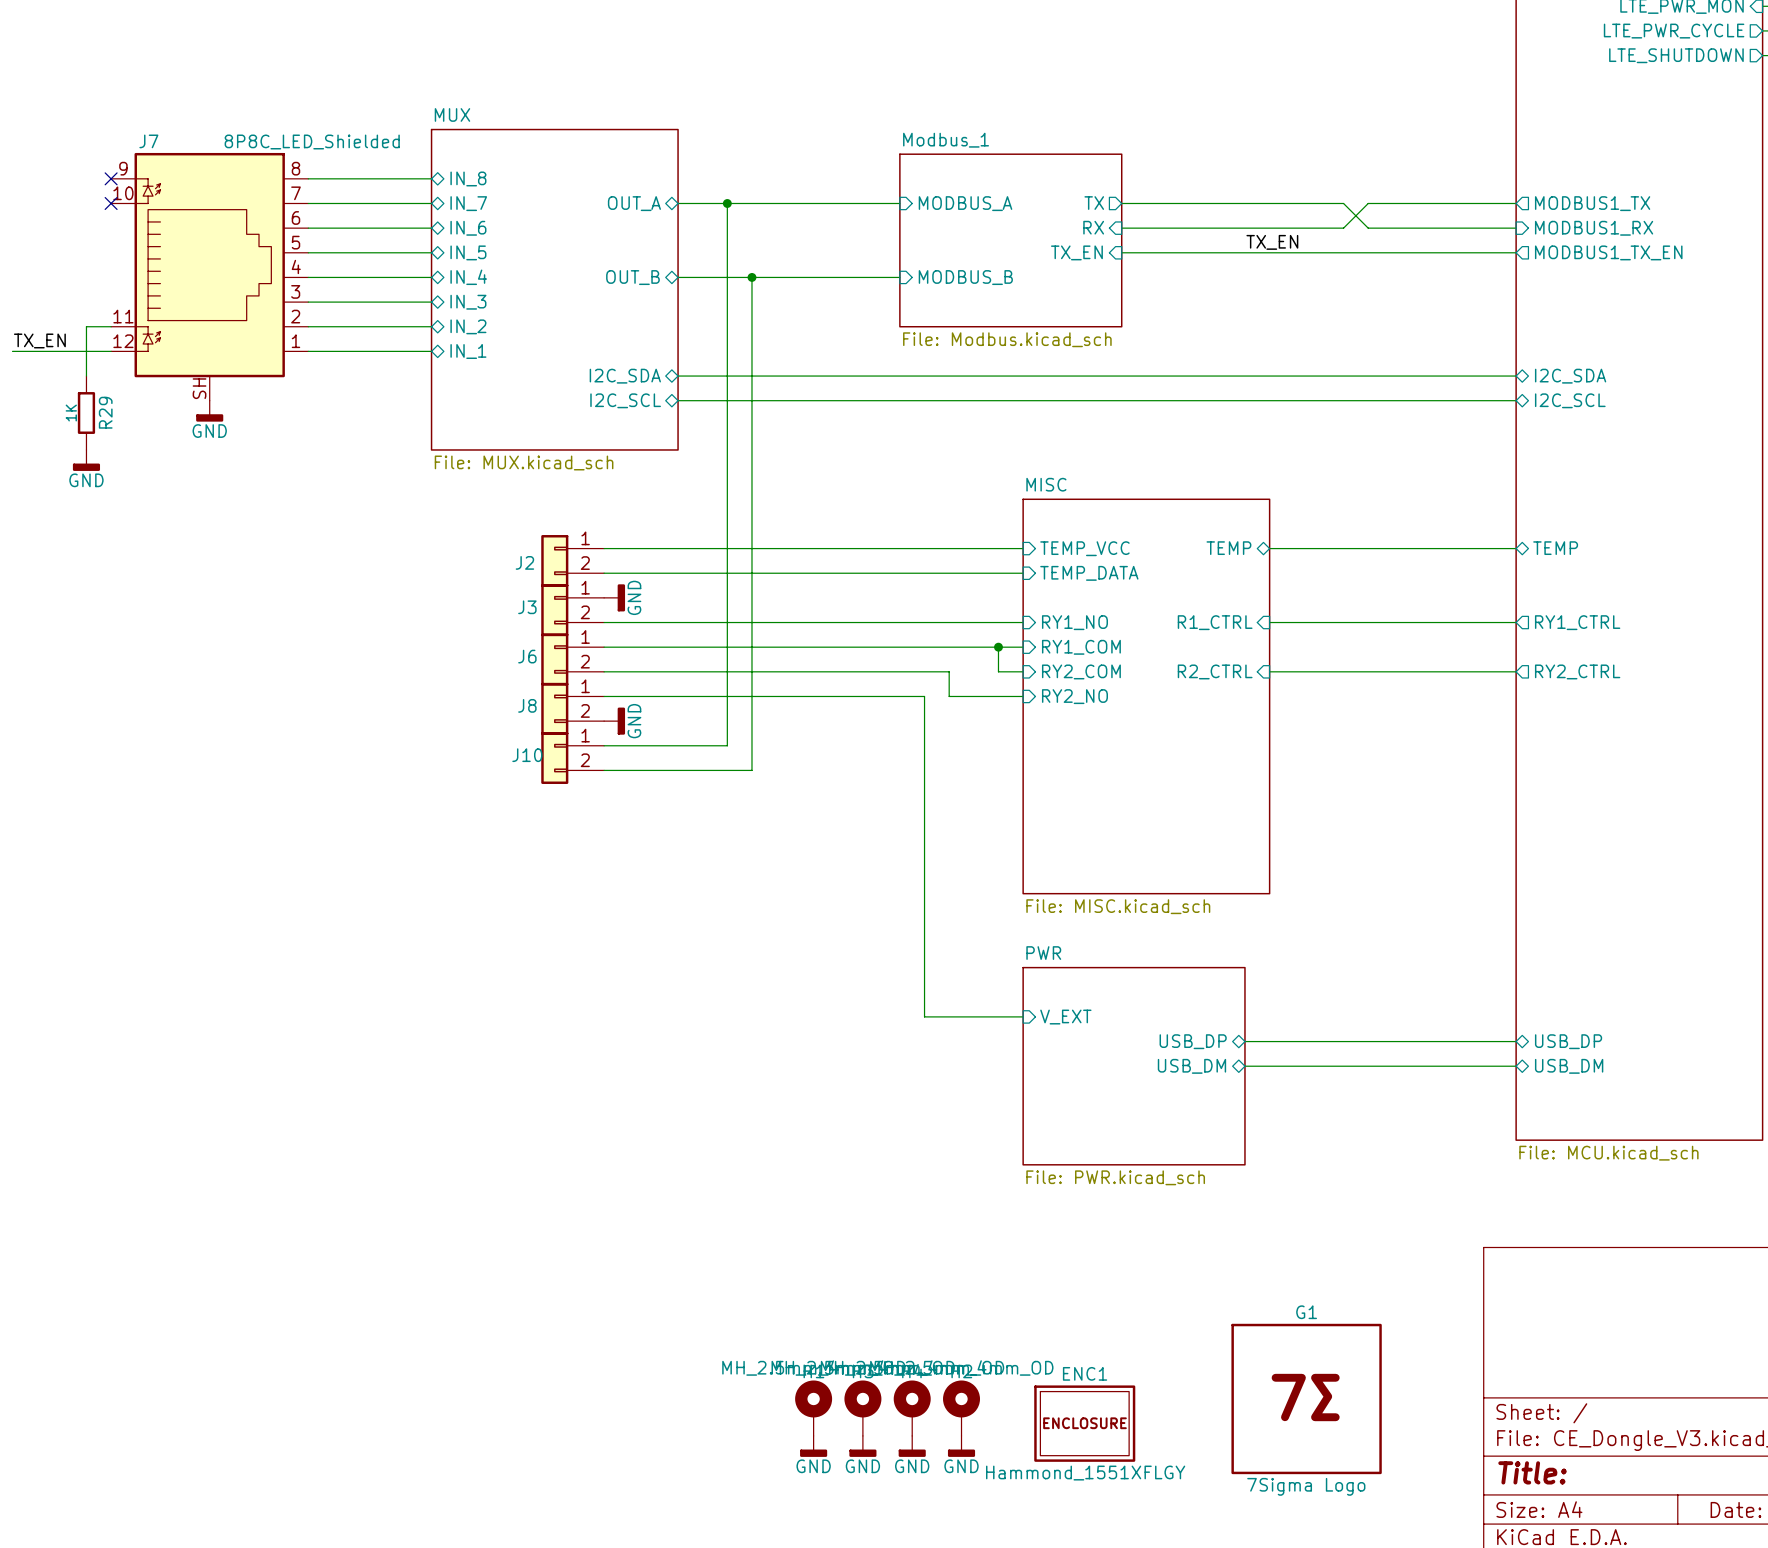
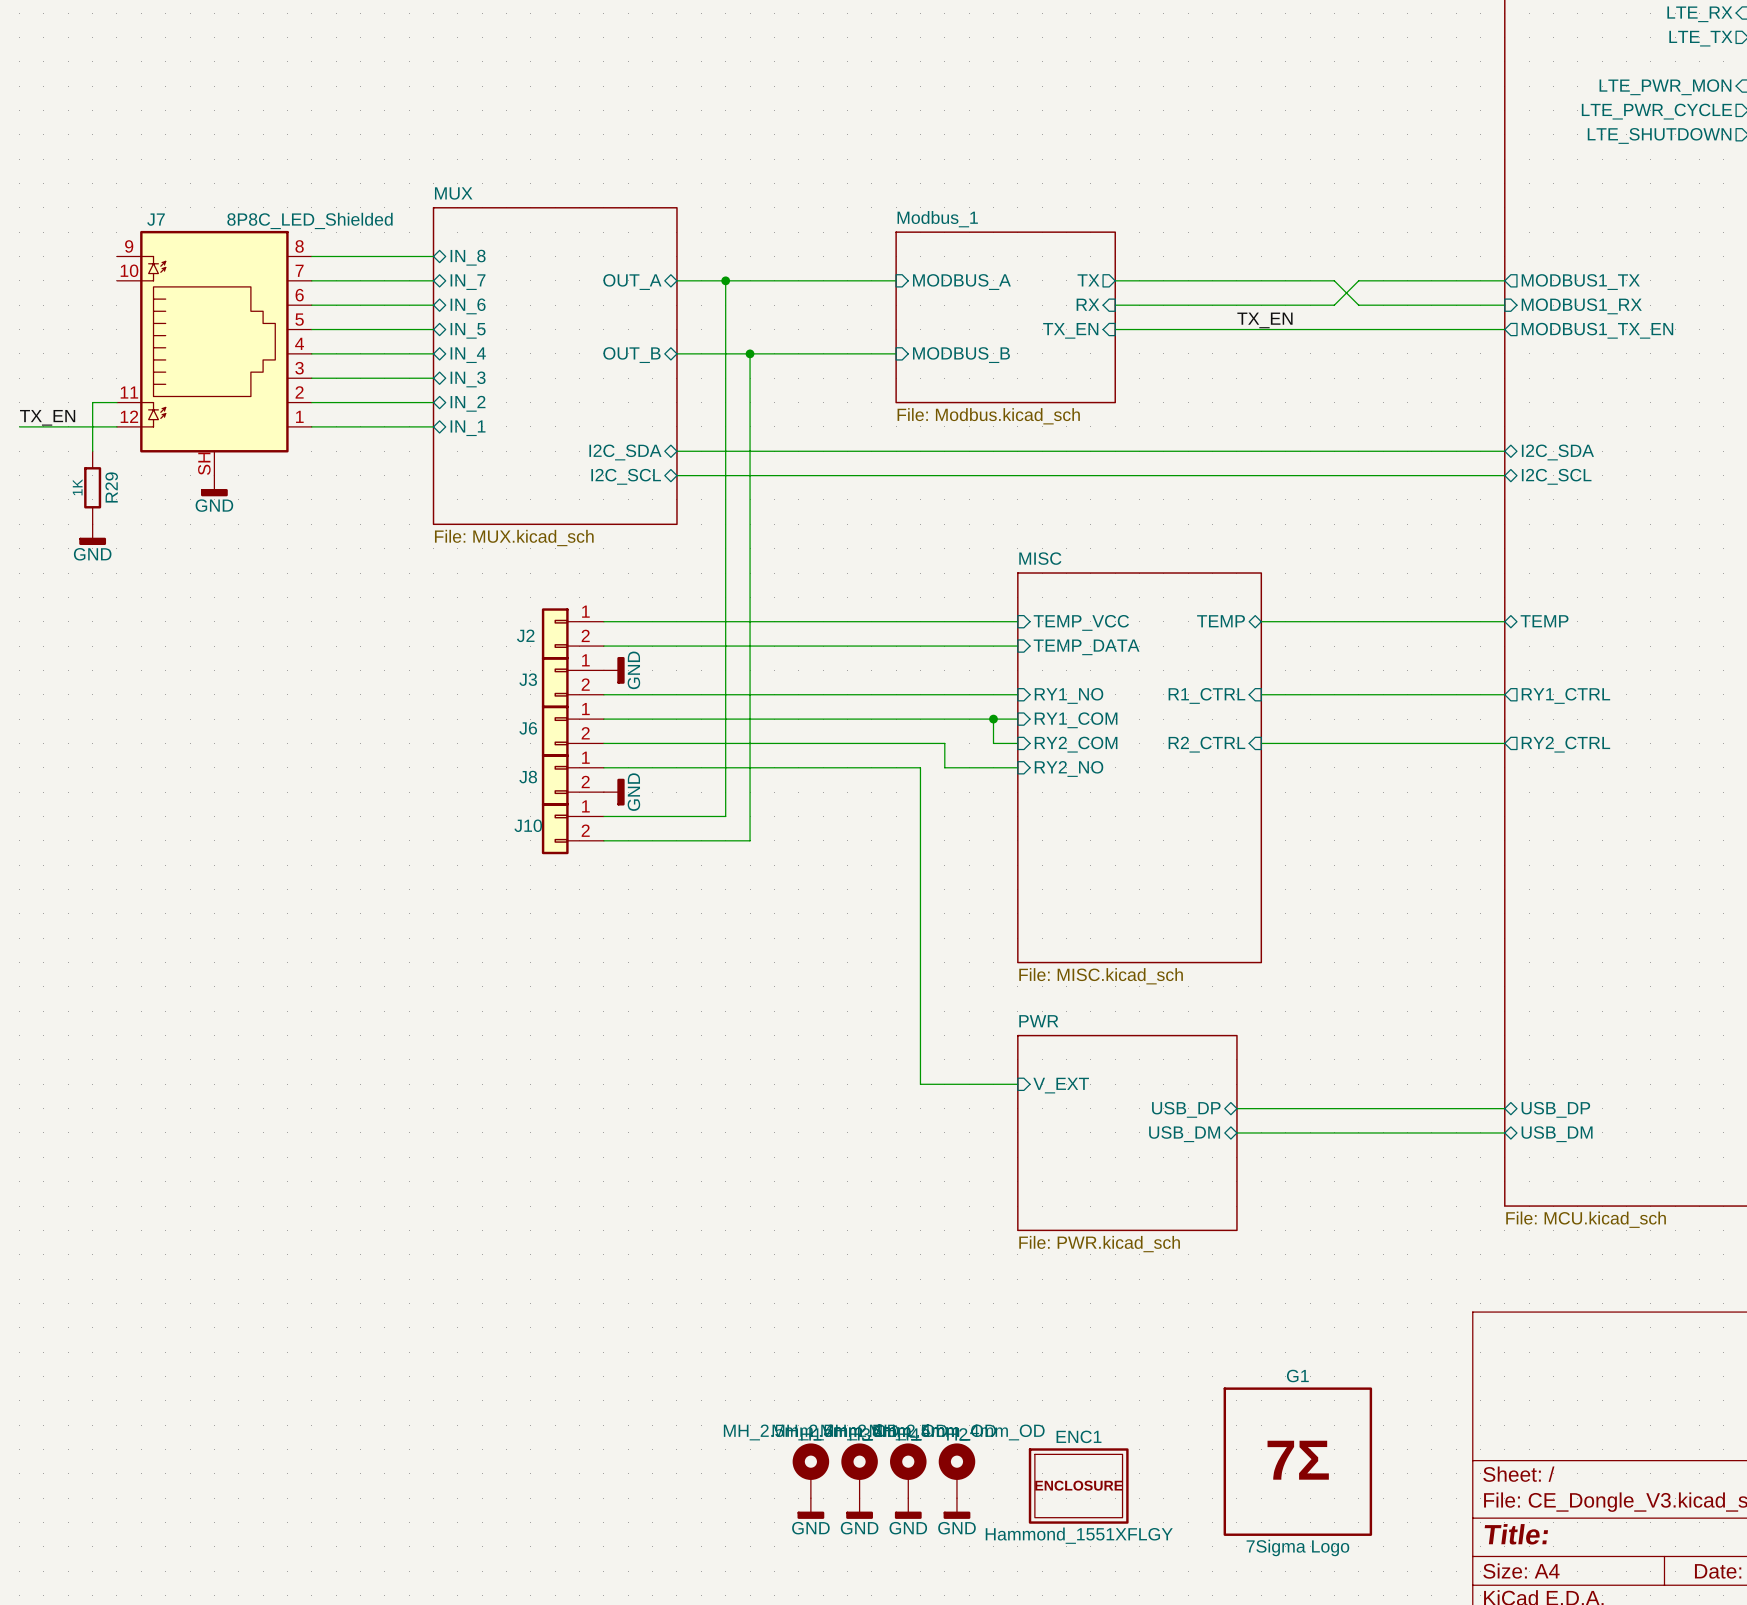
no-connect mark: (111, 178) -> none
no-connect mark: (111, 203) -> none

